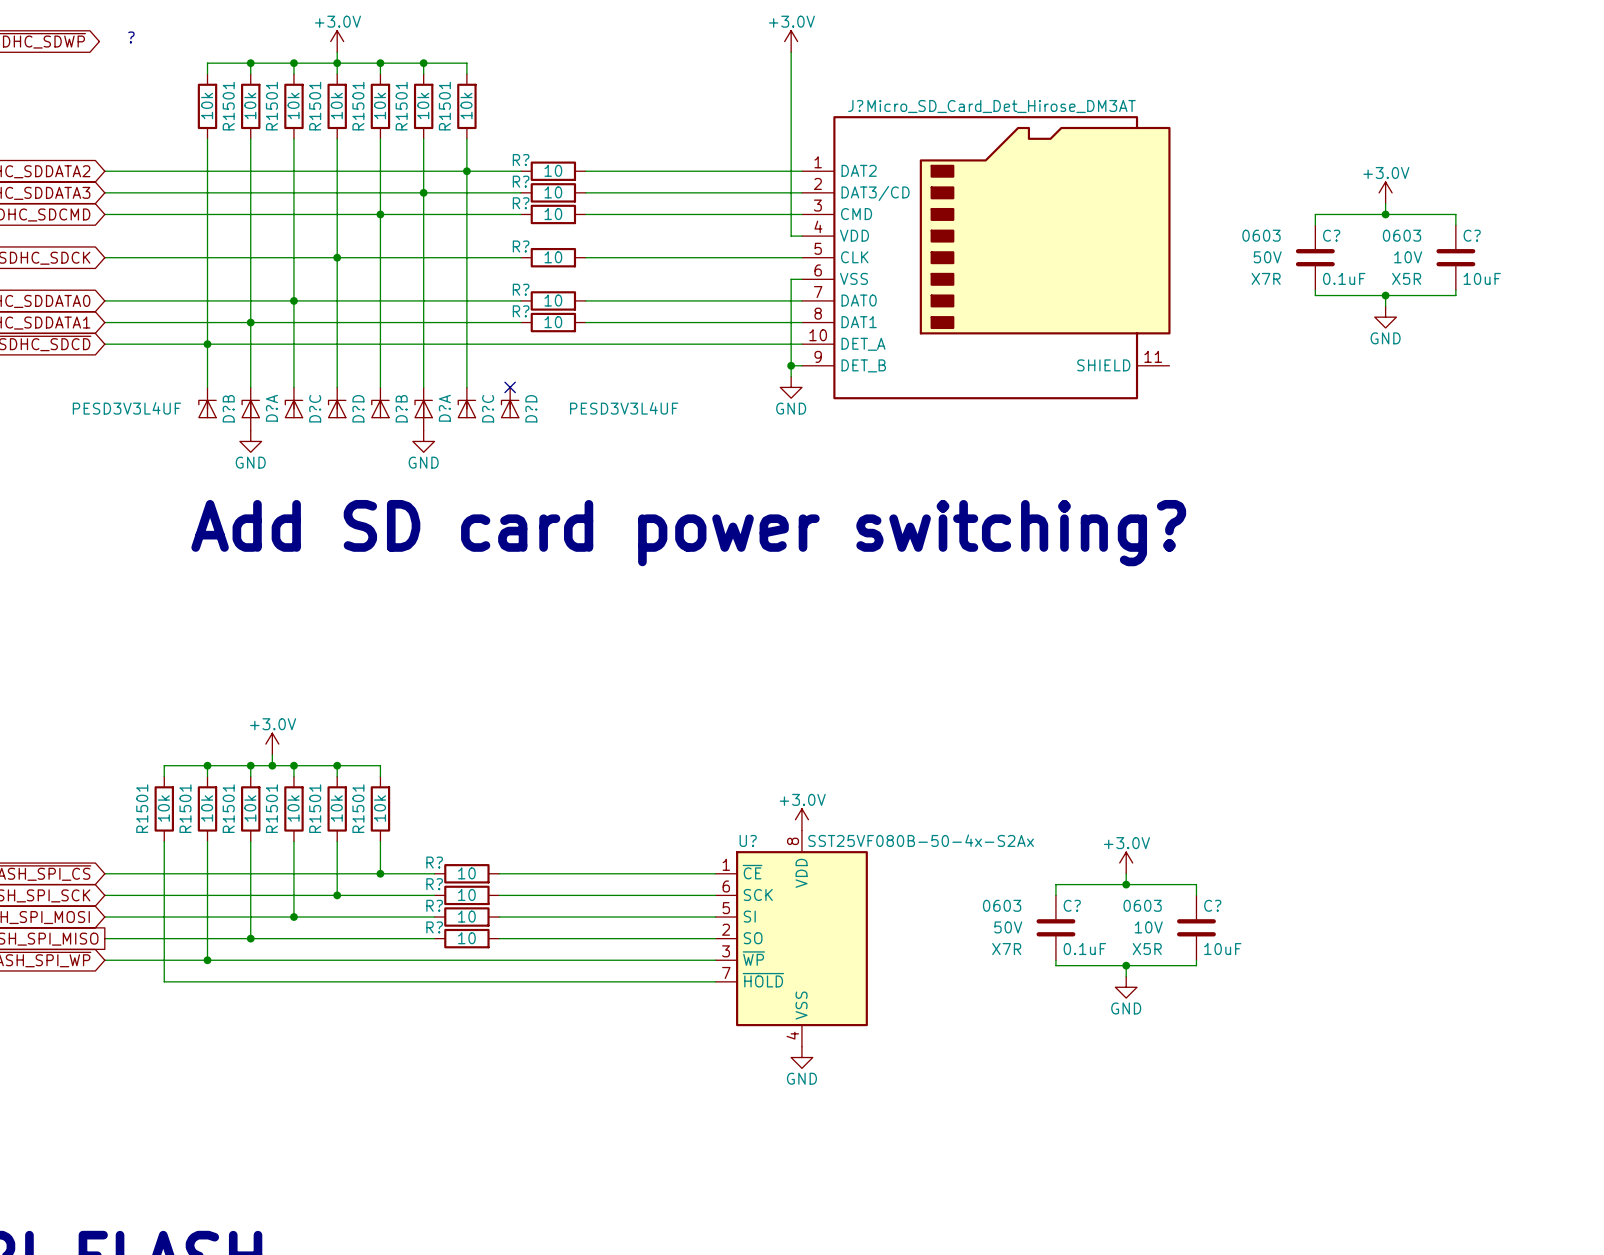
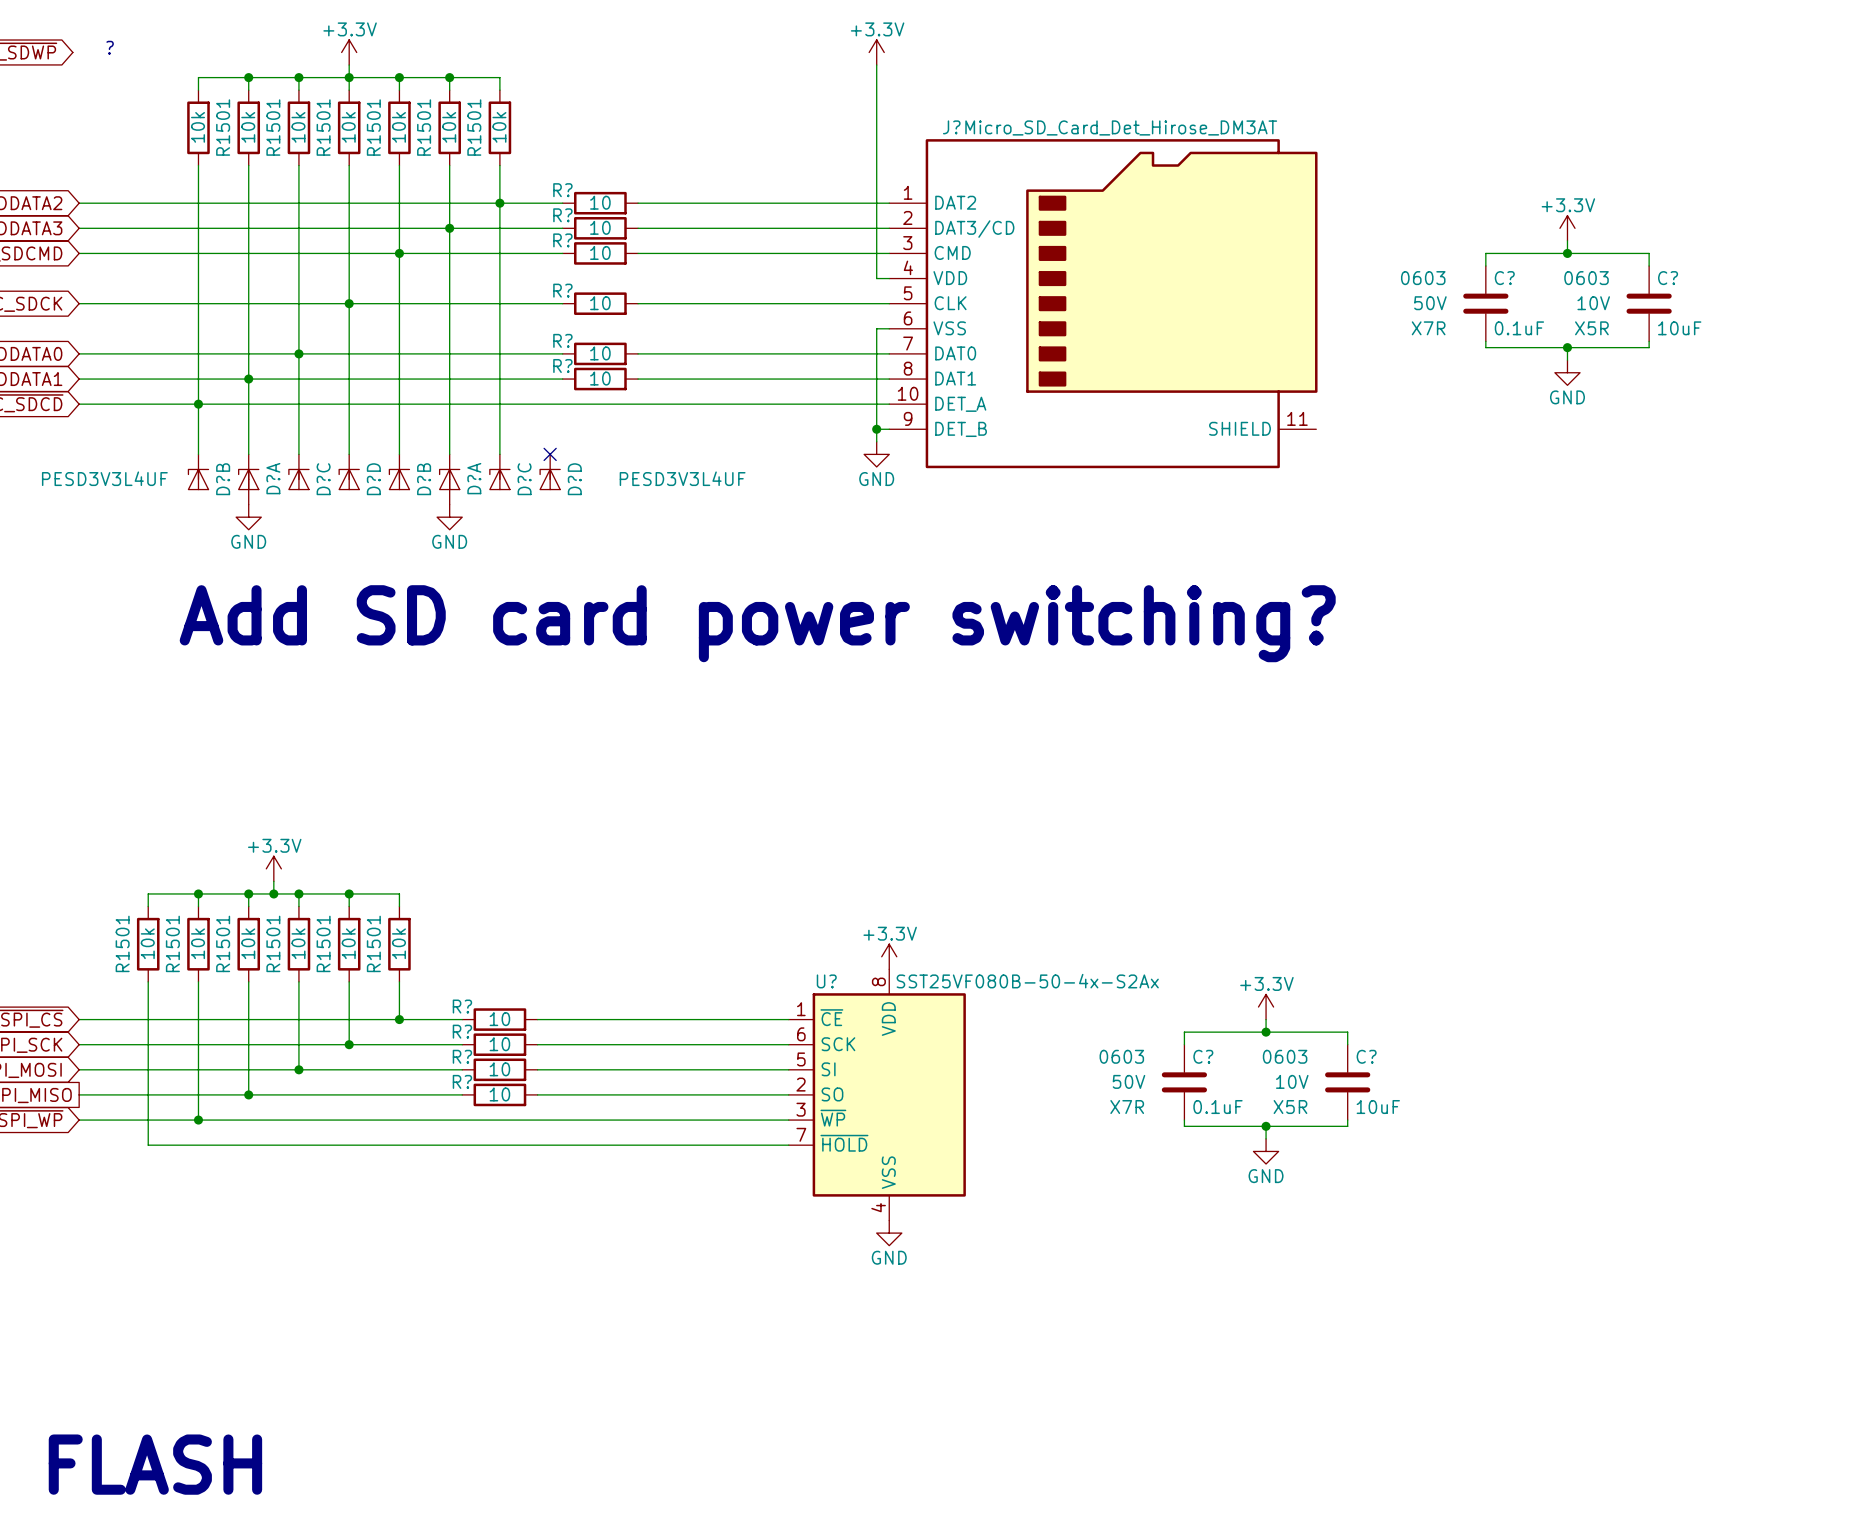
power symbol: +3.0V (337, 41) -> +3.3V (349, 52)
power symbol: +3.0V (791, 41) -> +3.3V (876, 52)
power symbol: +3.0V (1385, 192) -> +3.3V (1567, 228)
power symbol: +3.0V (272, 744) -> +3.3V (273, 868)
power symbol: +3.0V (801, 819) -> +3.3V (889, 956)
power symbol: +3.0V (1126, 862) -> +3.3V (1266, 1007)

